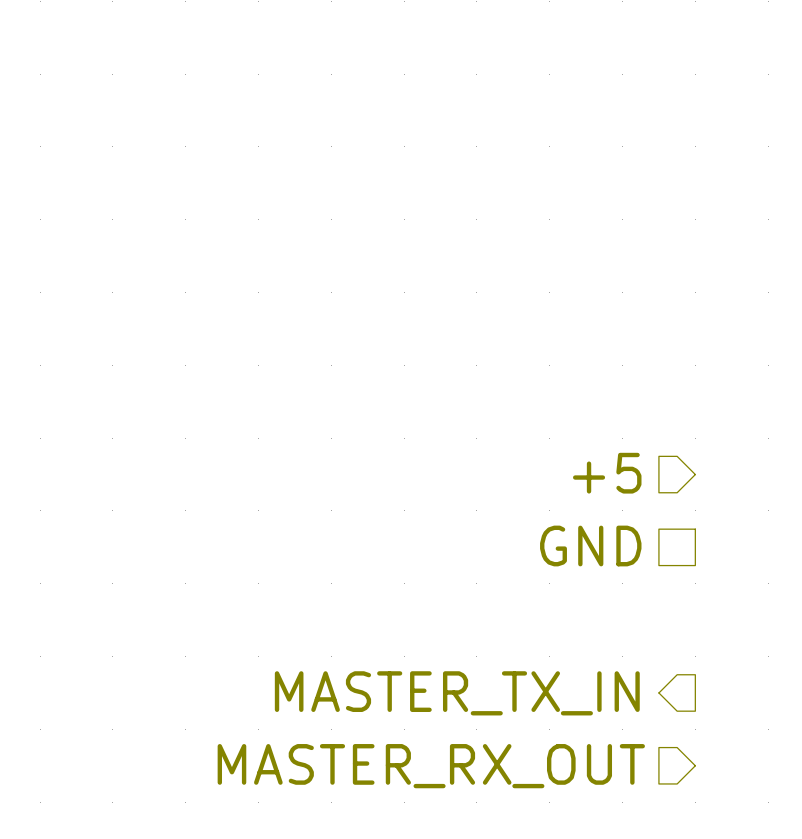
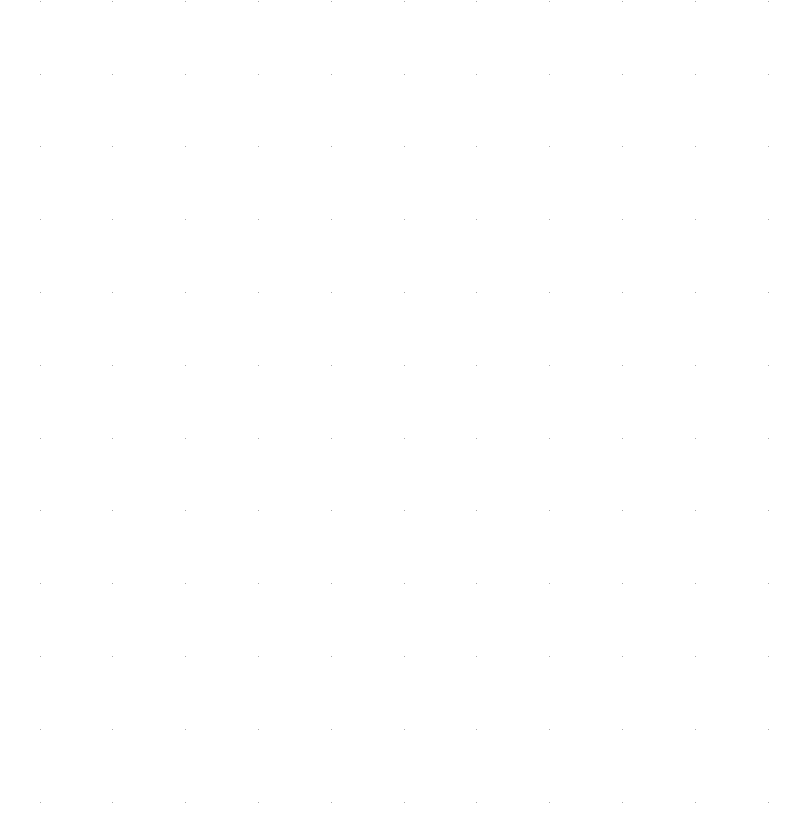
hierarchical label: +5 (607, 473) -> none
hierarchical label: GND (590, 546) -> none
hierarchical label: MASTER_TX_IN (457, 693) -> none
hierarchical label: MASTER_RX_OUT (431, 766) -> none

